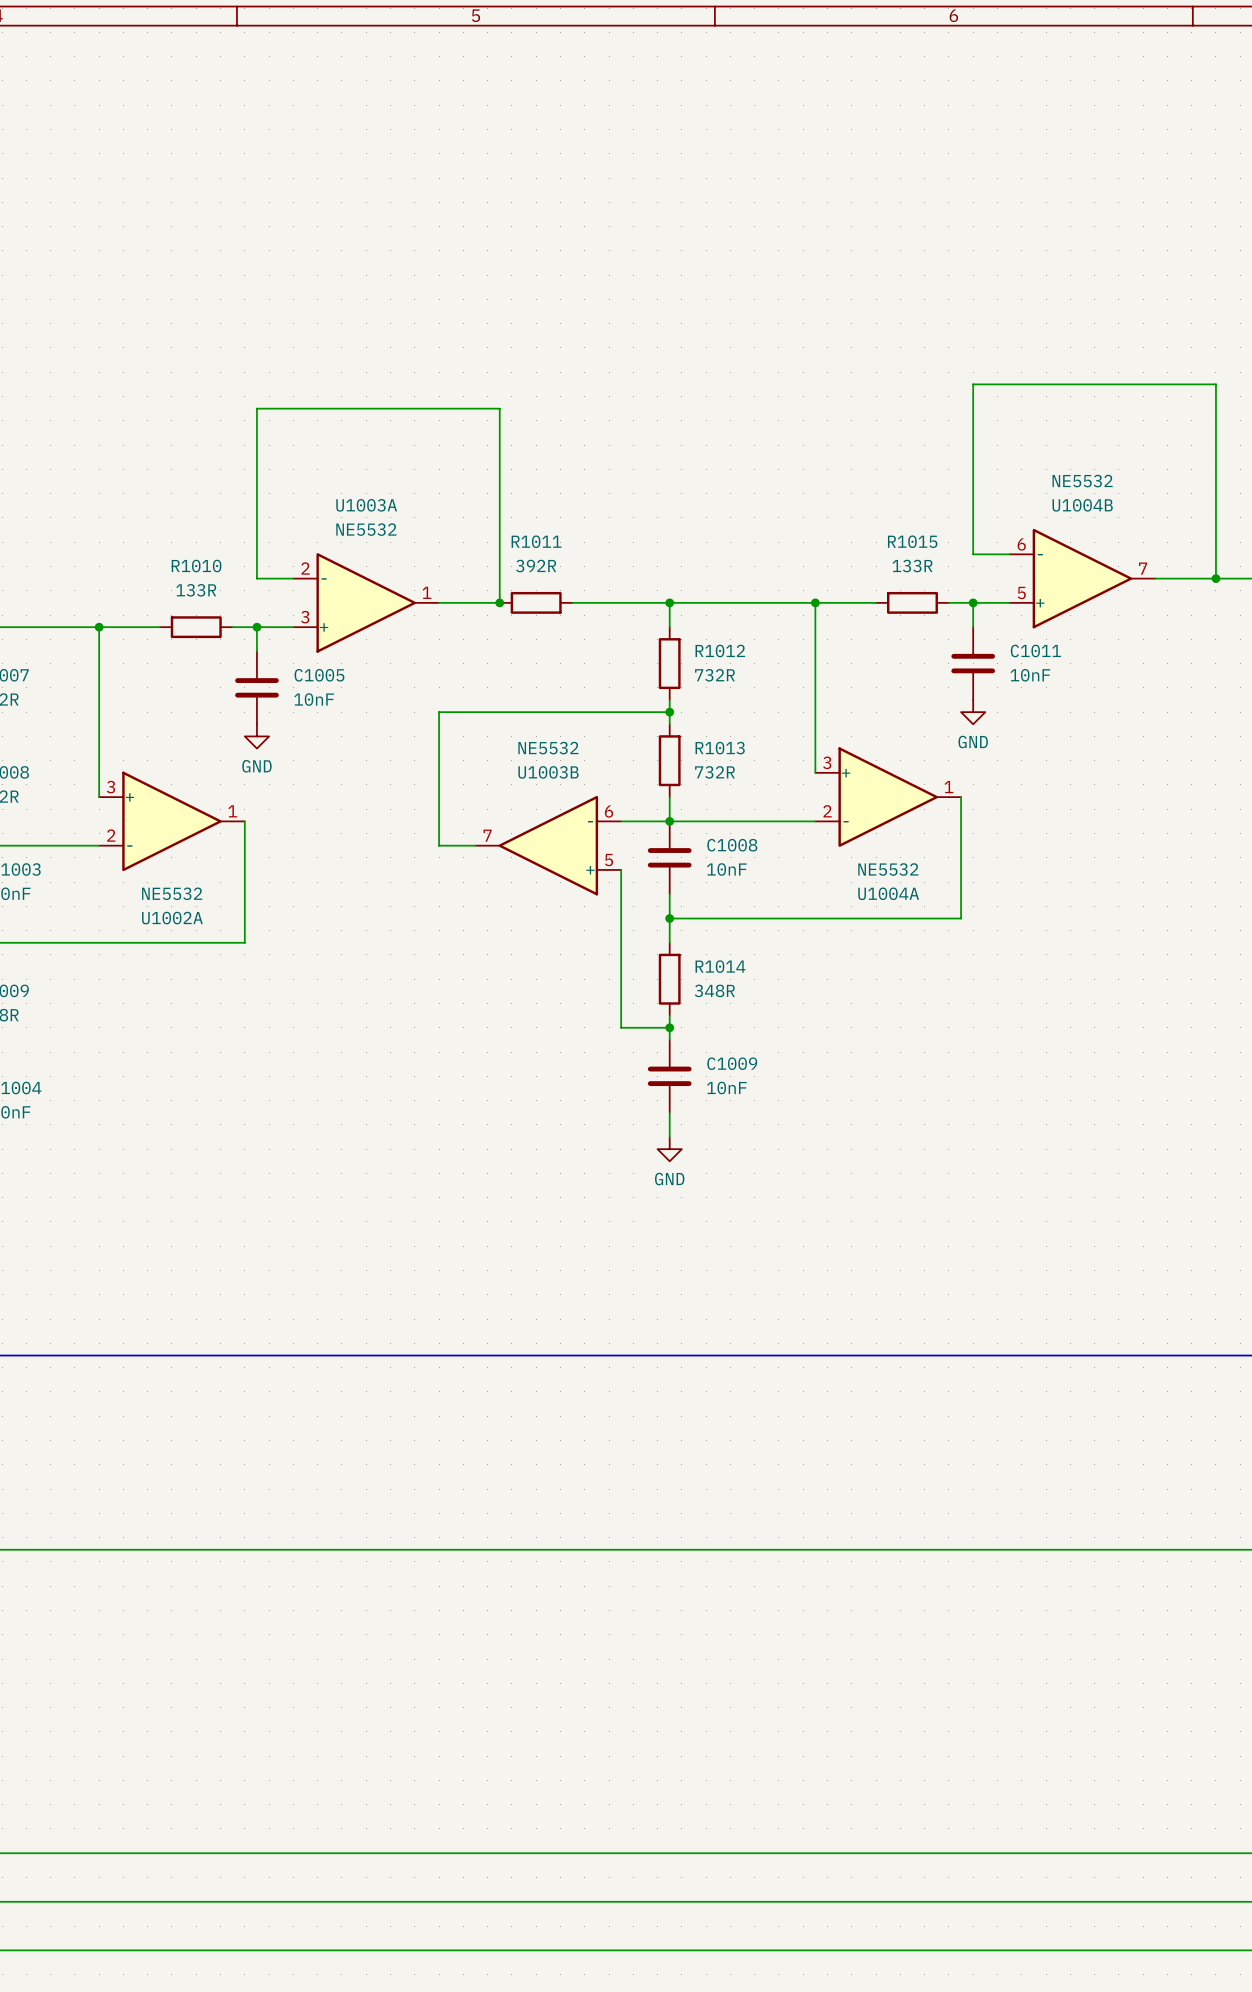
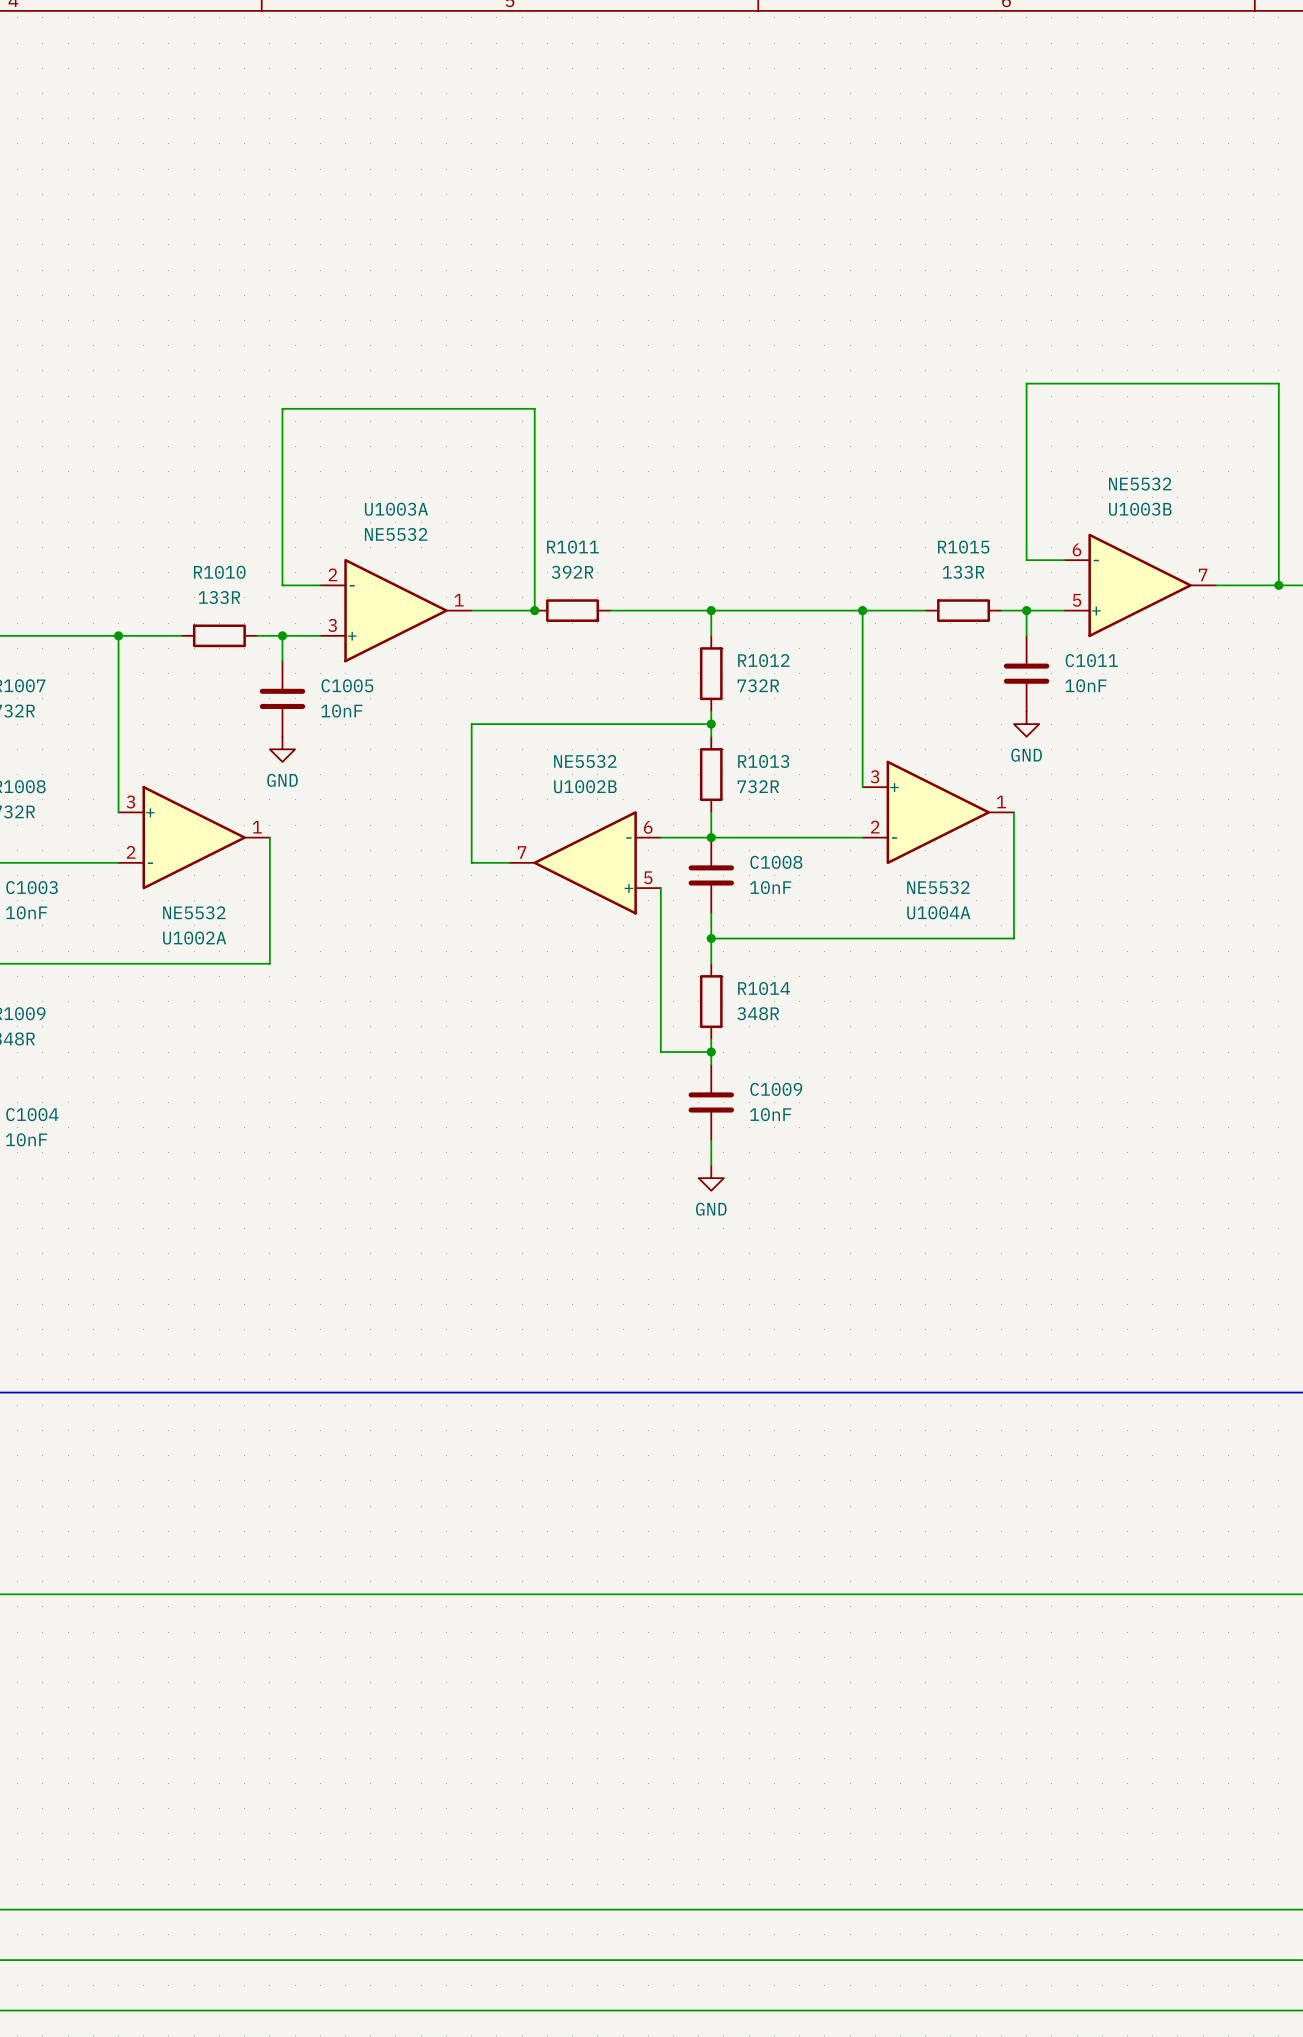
U1004B name: U1004B (1082, 505) -> U1003B (1140, 509)
U1003B name: U1003B (548, 772) -> U1002B (585, 786)

